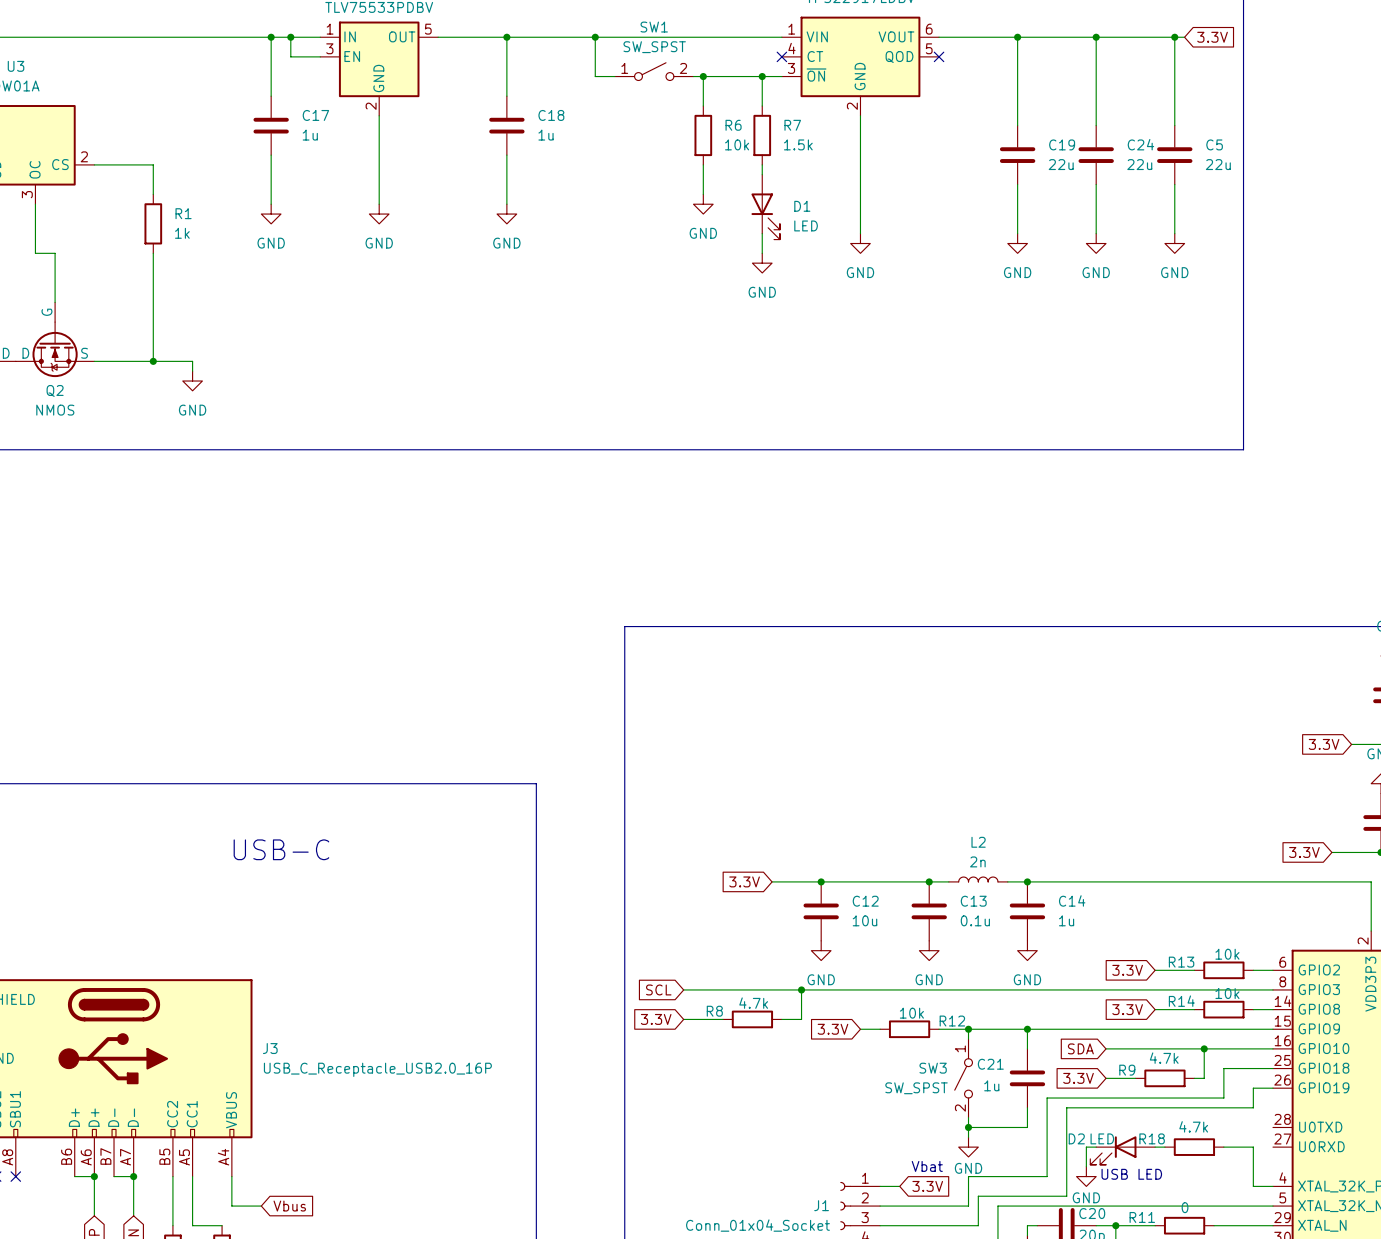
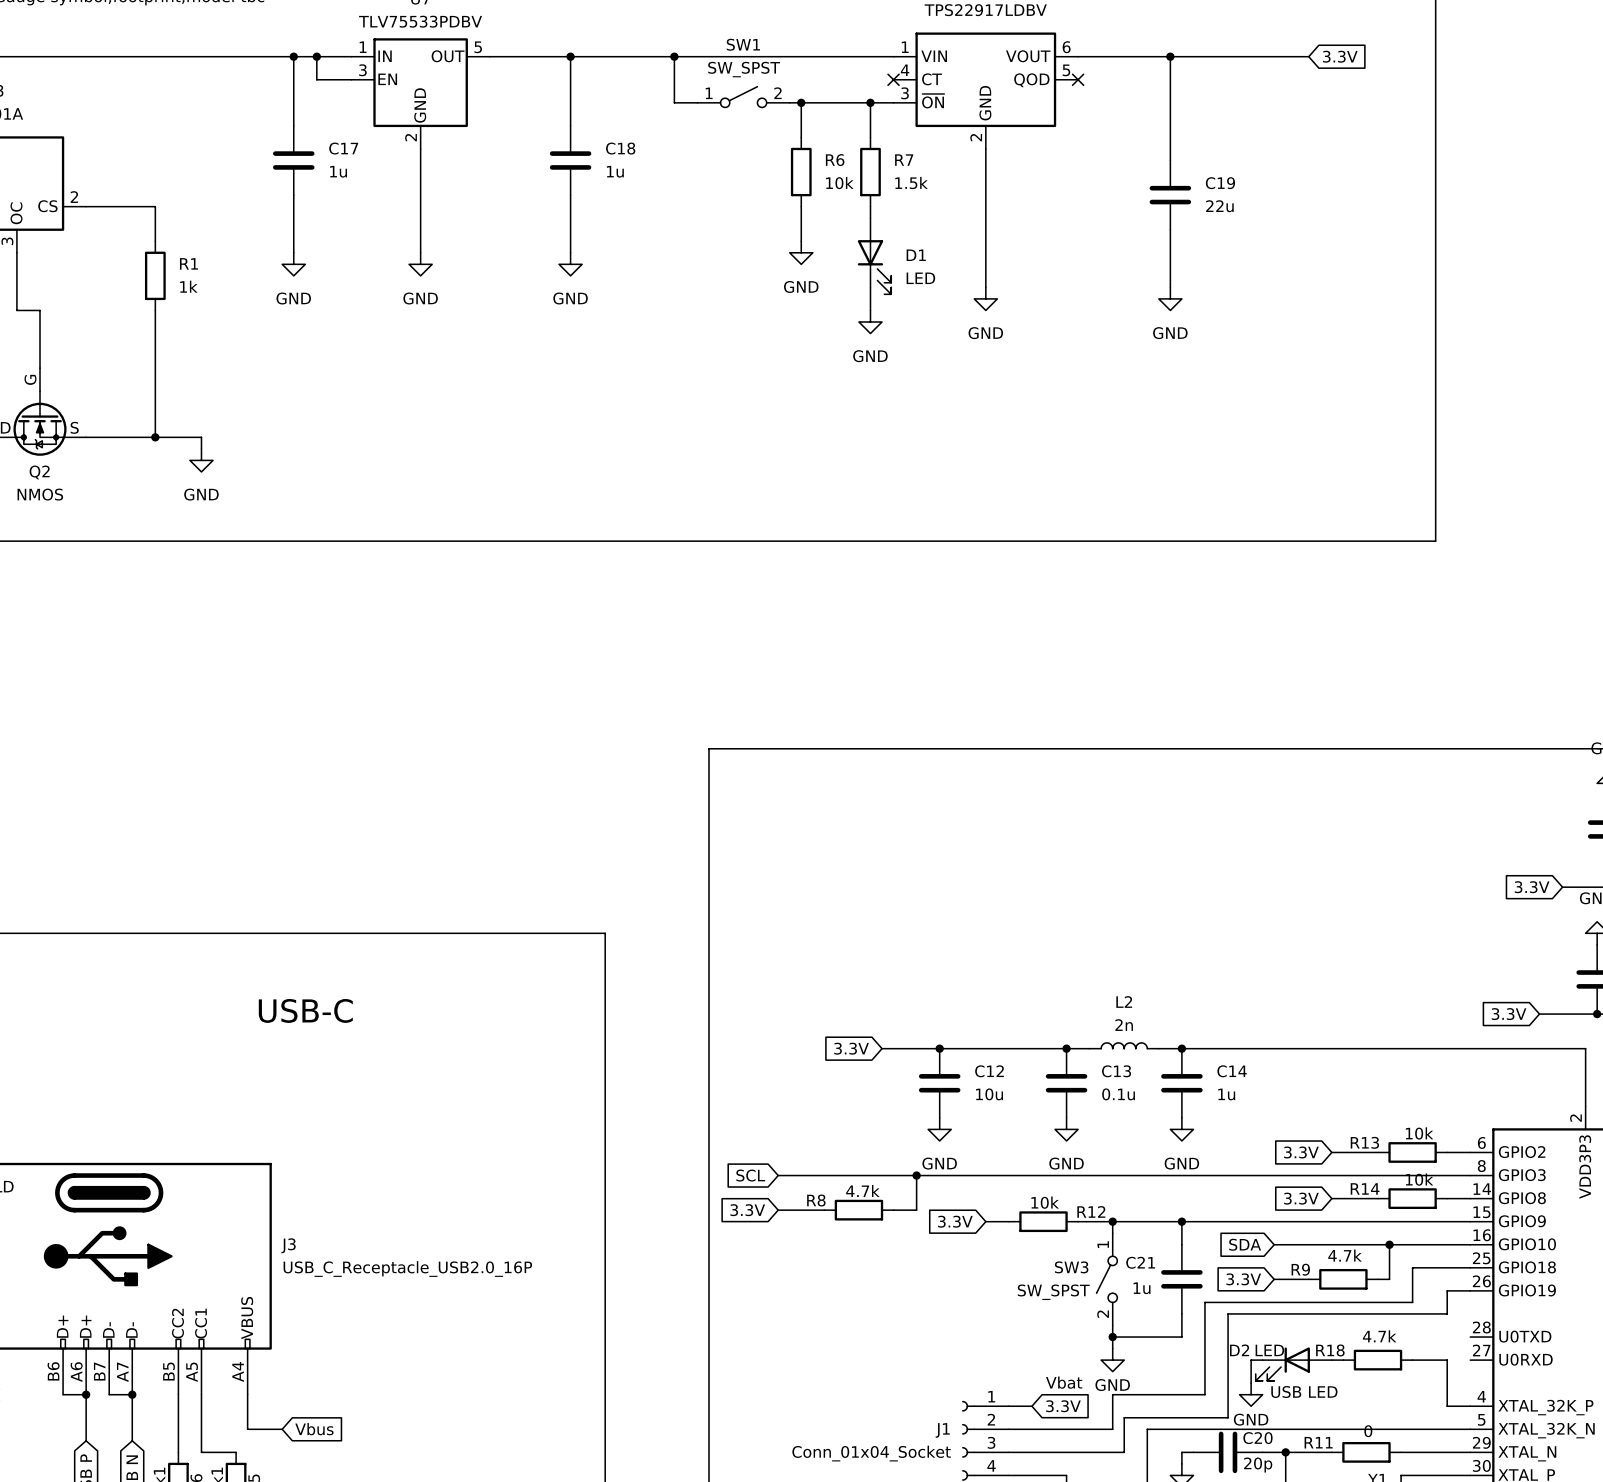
wire: (1096, 37) (1096, 125) -> none
junction: (1096, 37) -> none
wire: (1135, 37) (1184, 37) -> none
wire: (1174, 37) (1174, 125) -> none
junction: (1174, 37) -> none
global label position: 3.3V (1212, 37) -> 3.3V (1340, 56)
C24: 22u (1096, 155) -> none
C5: 22u (1174, 155) -> none
wire: (1096, 184) (1096, 233) -> none
wire: (1174, 184) (1174, 233) -> none
power symbol: GND (1096, 243) -> none
power symbol: GND (1174, 243) -> none

